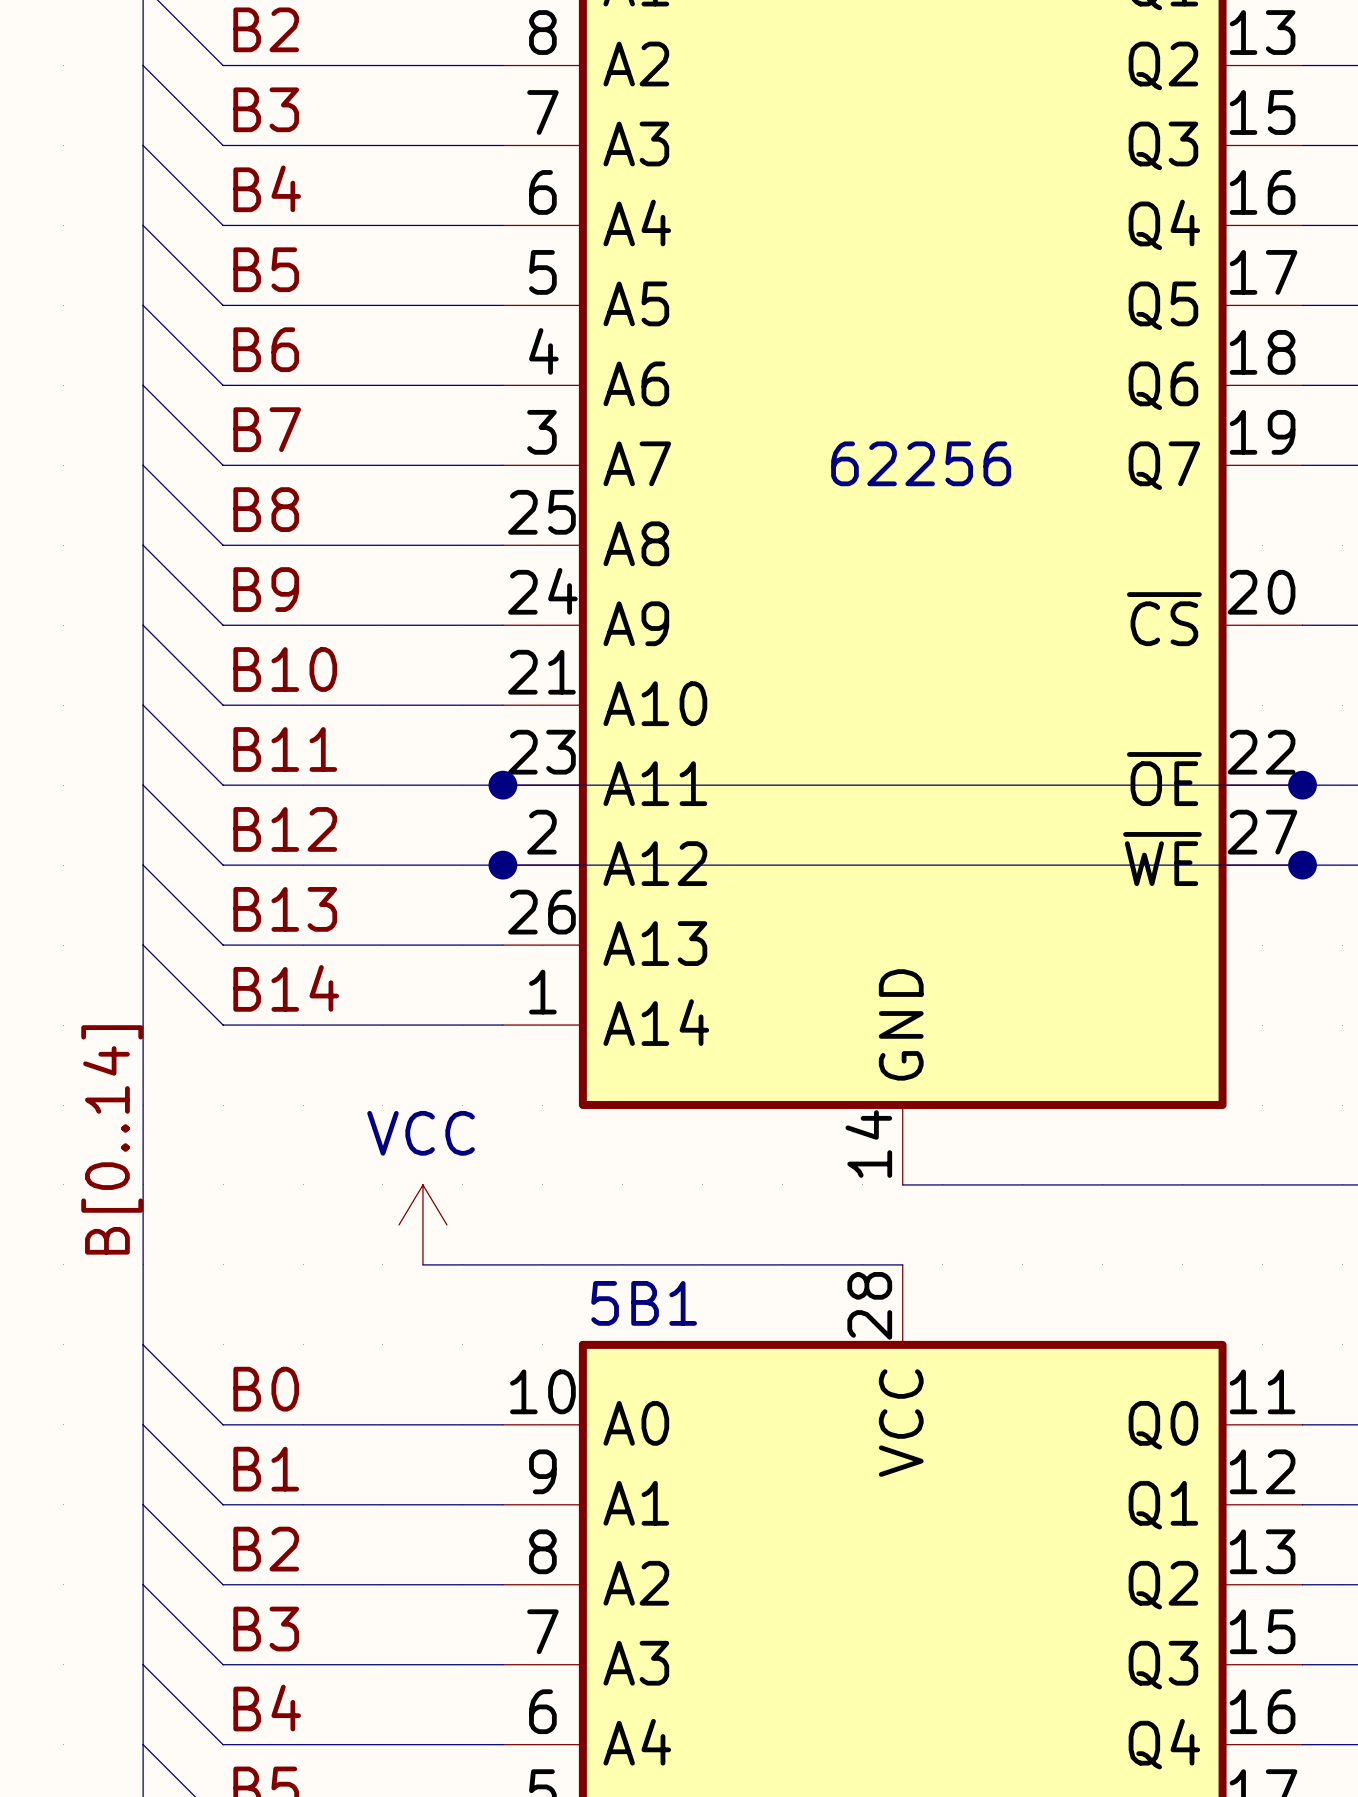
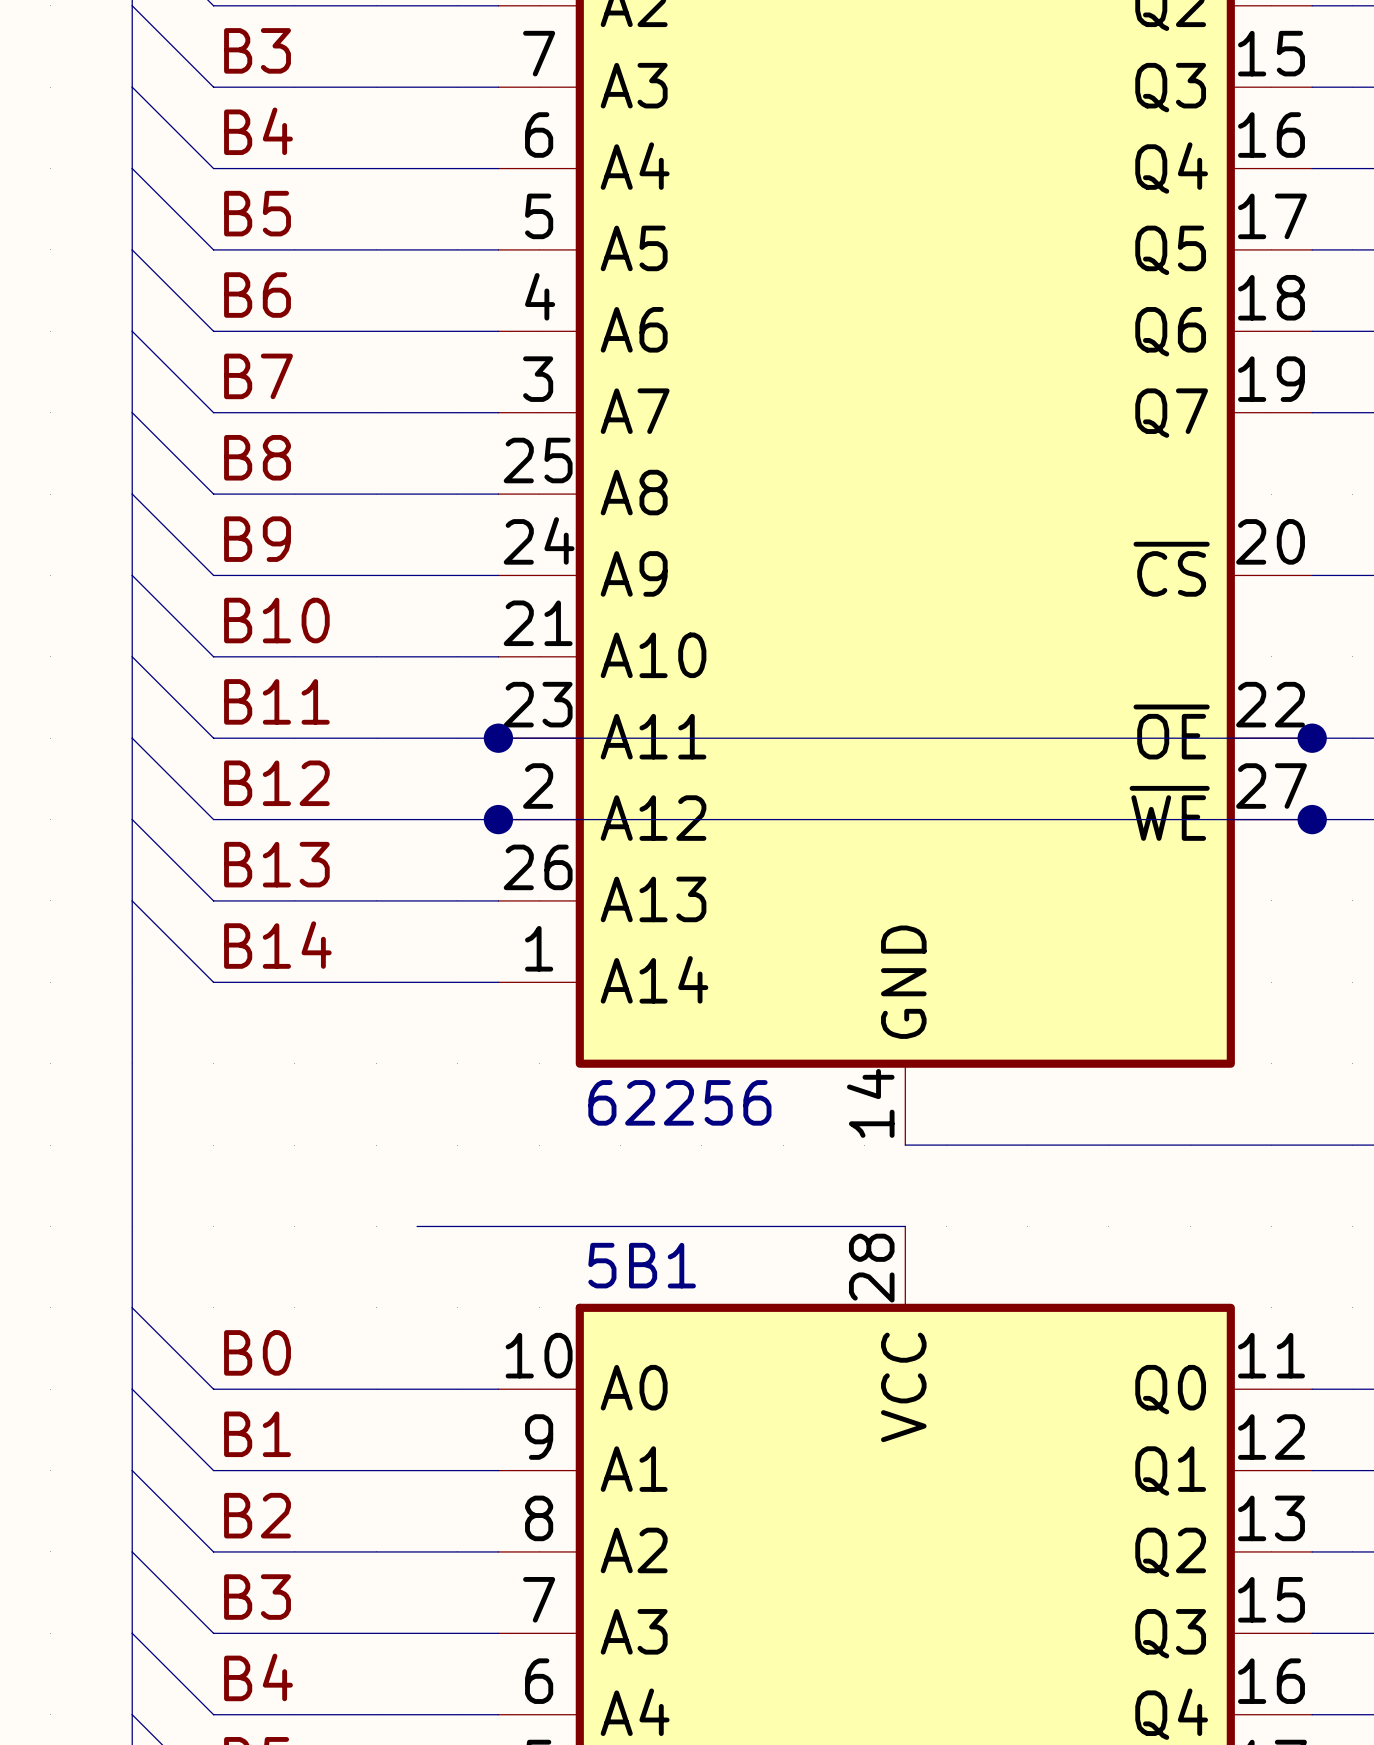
part value position: 62256 (921, 463) -> 62256 (679, 1102)
label: B[0..14] (112, 1139) -> none
power symbol: VCC (422, 1224) -> none

